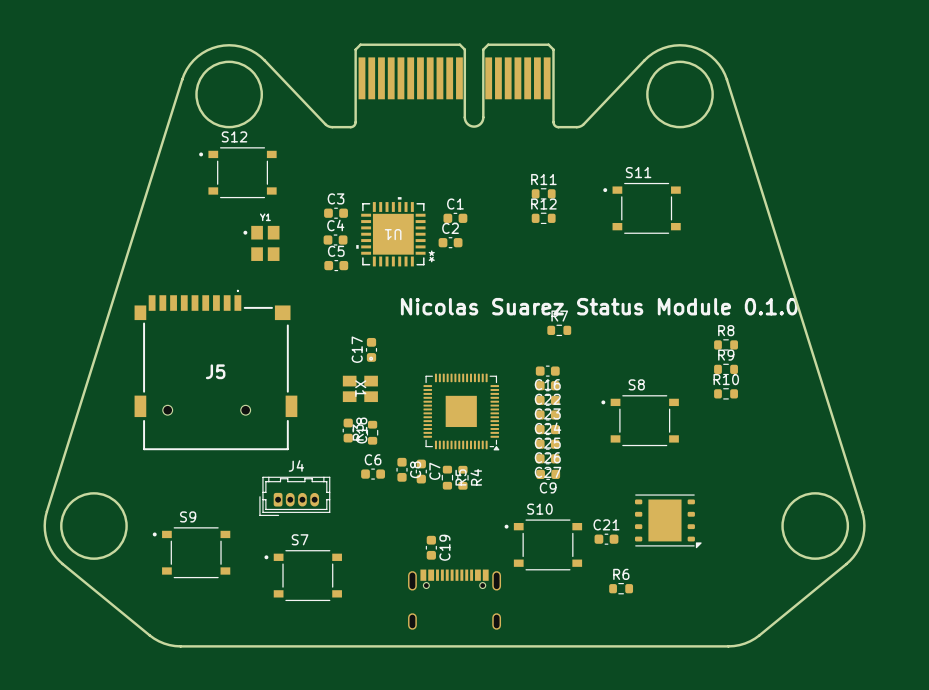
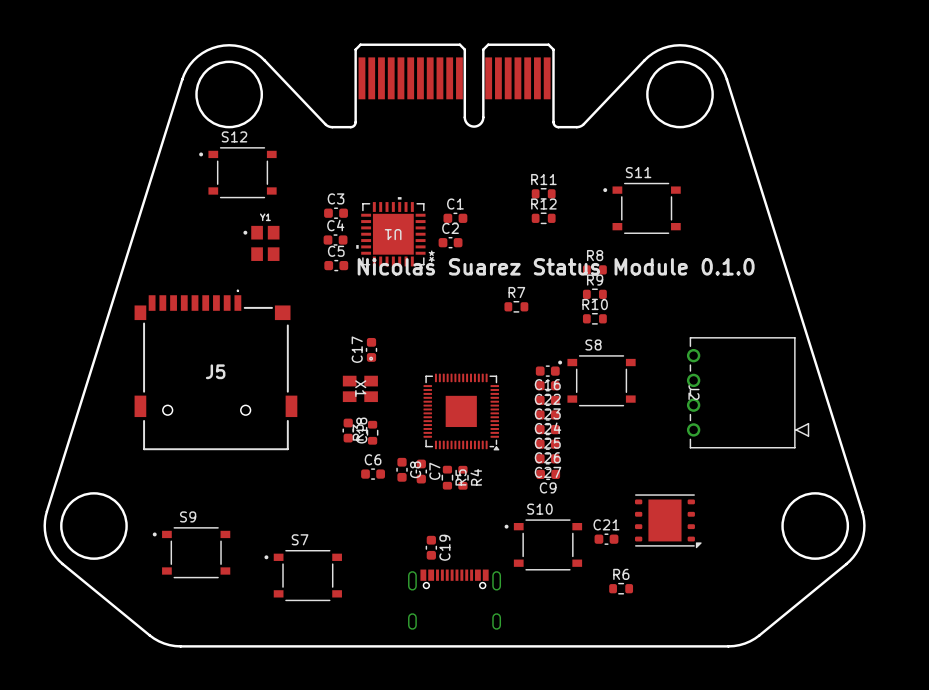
text position: Nicolas Suarez Status Module 0.1.0 (599, 306) -> Nicolas Suarez Status Module 0.1.0 (556, 266)
R7 position: (559, 330) -> (516, 306)
R8 position: (726, 344) -> (594, 269)
R9 position: (726, 369) -> (594, 294)
J2: none -> (748, 392)
R10 position: (726, 393) -> (594, 318)
S8 position: (640, 420) -> (596, 380)
J4: (294, 496) -> none

